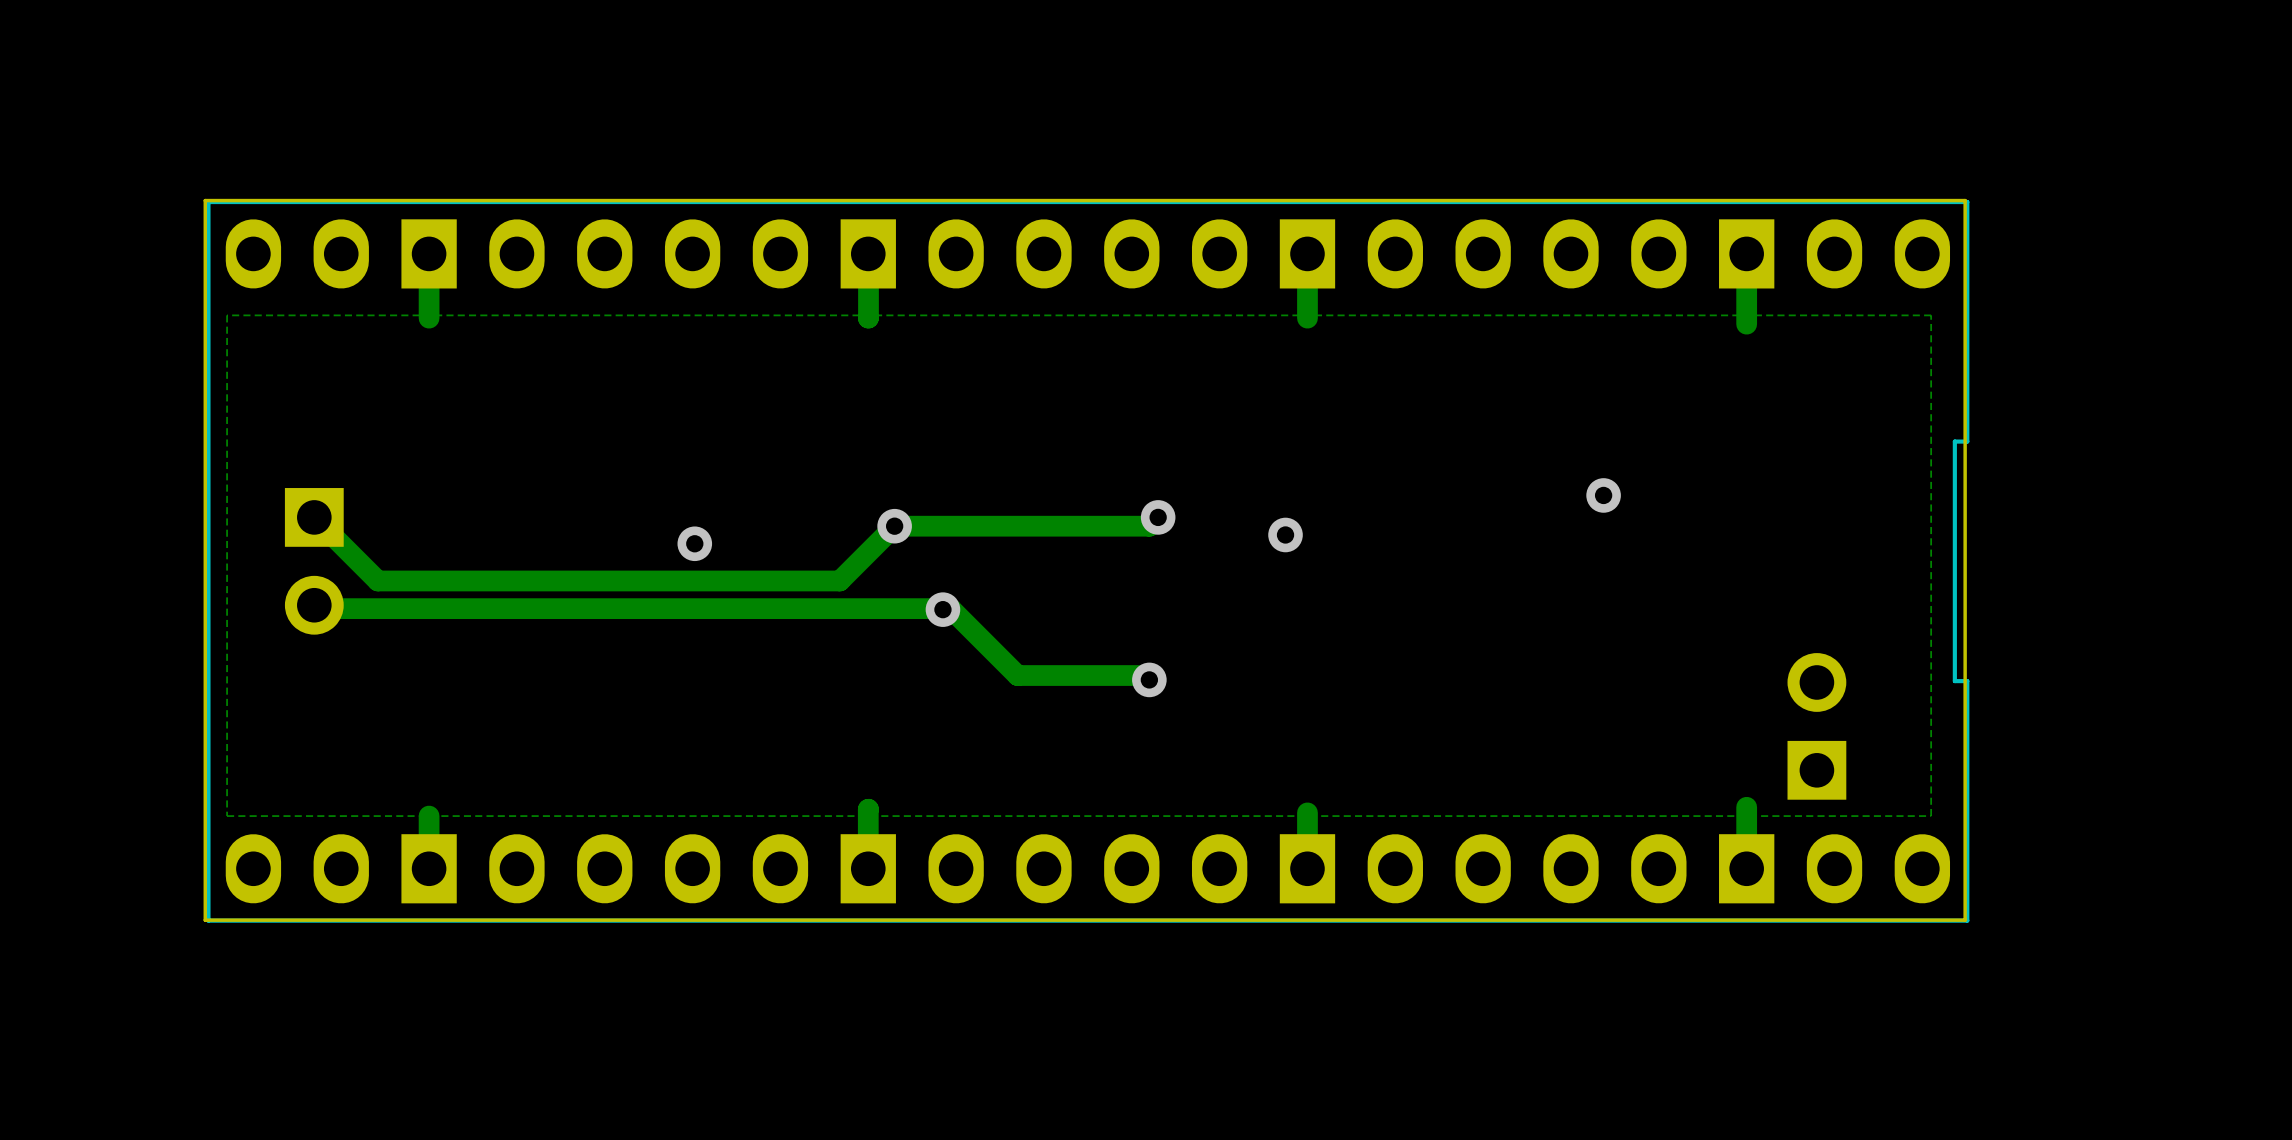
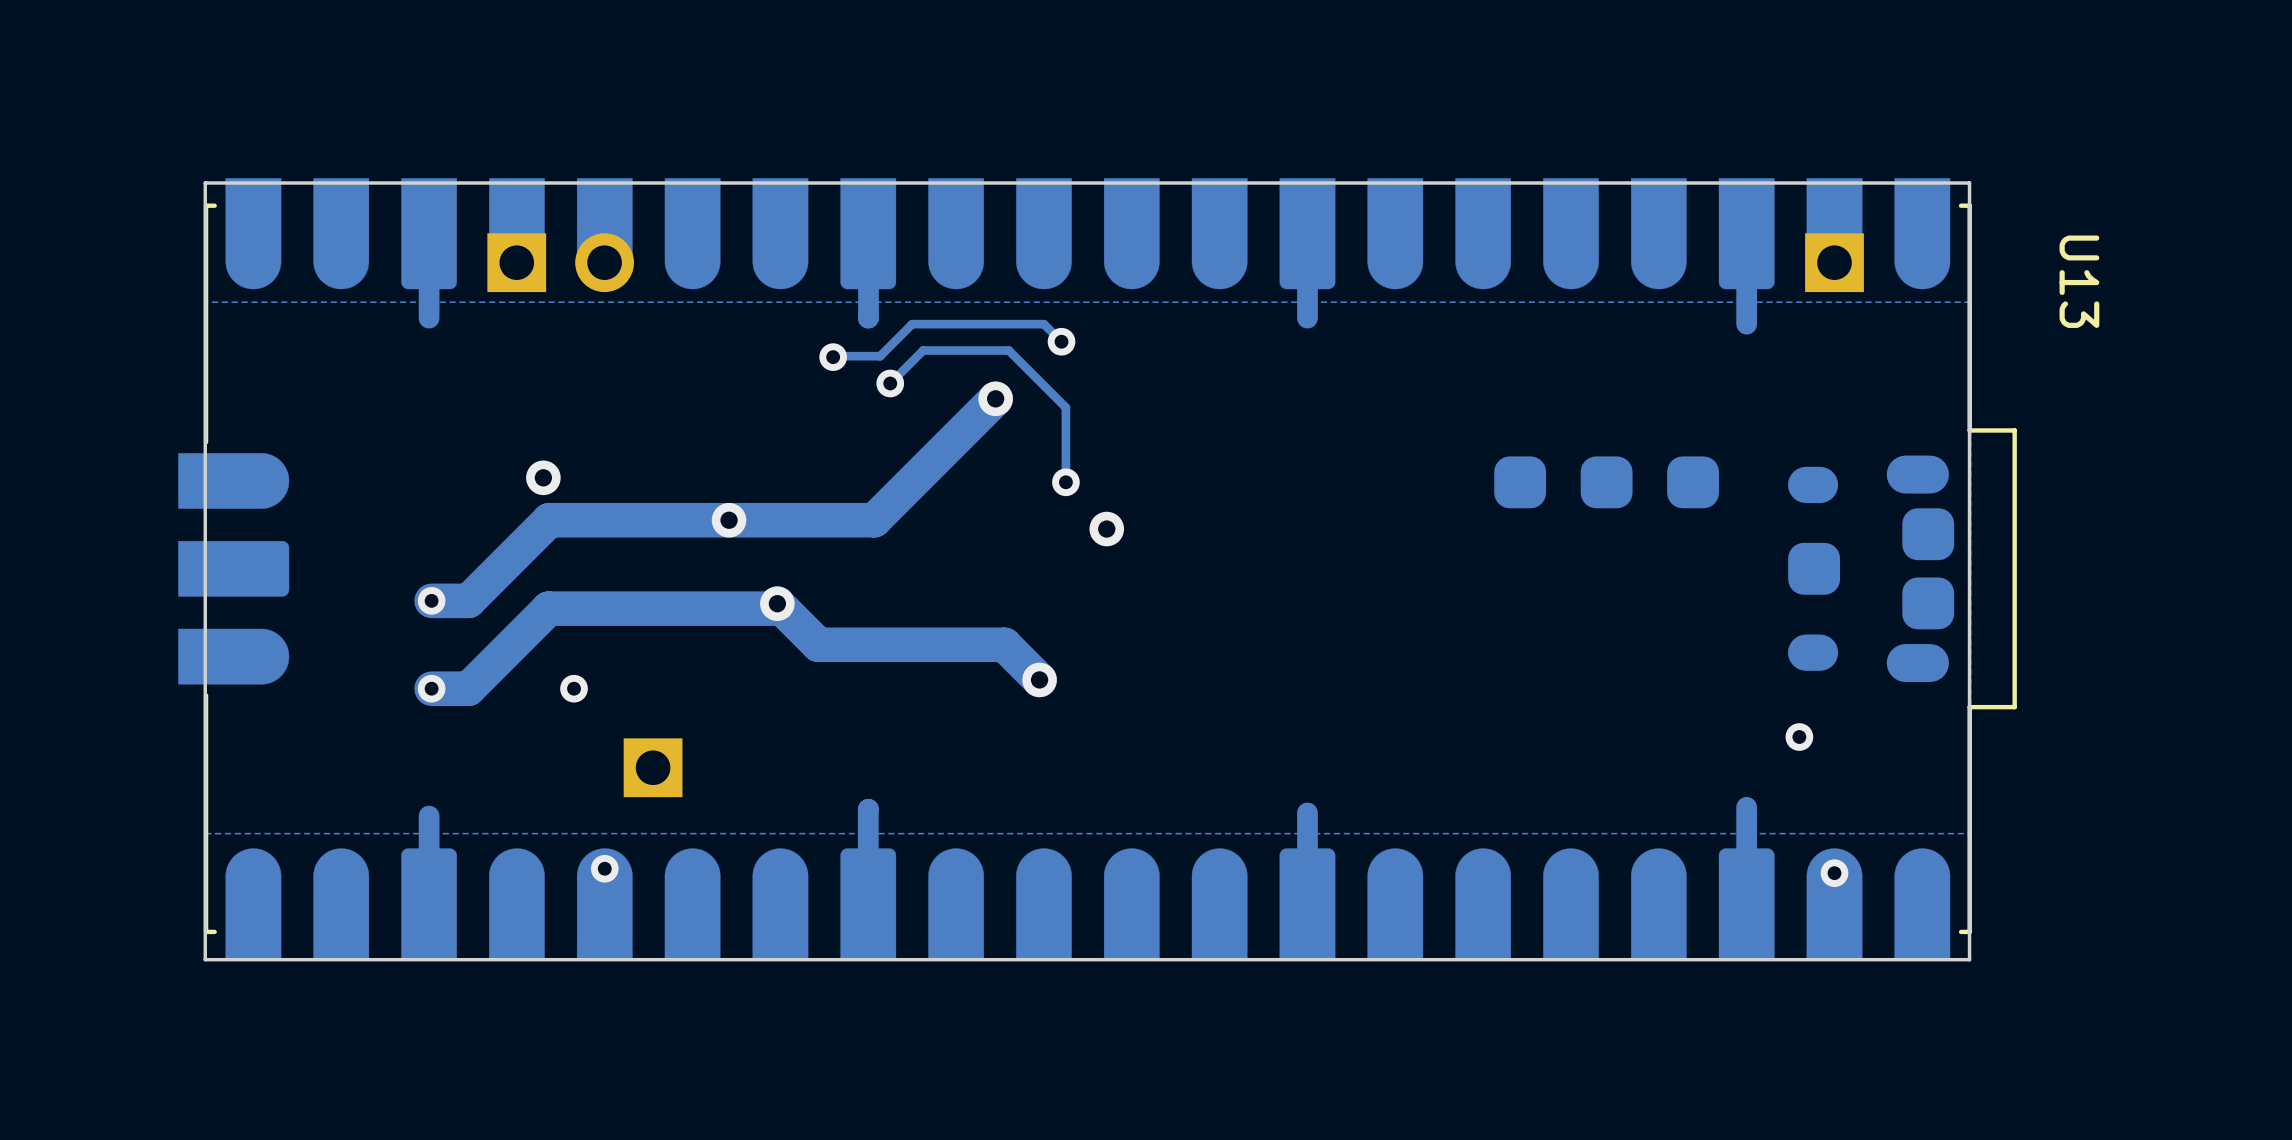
board edge: (205, 200) (1965, 200) (1965, 920) (205, 920) -> (205, 200) (205, 183) (1969, 183) (1969, 959) (205, 959) (205, 920)
part: none -> (1834, 262)
zone outline: (1931, 315) (227, 315) (227, 816) (1931, 816) (1931, 315) -> (1970, 302) (1970, 833) (205, 833) (205, 302) (1970, 302)
track: none -> (1061, 341) (1043, 324) (912, 324) (880, 356) (833, 357)
via: none -> (1061, 341)
via: none -> (833, 357)
track: none -> (890, 383) (923, 350) (1008, 350) (1065, 407) (1065, 482)
via: none -> (890, 383)
track: none -> (995, 398) (874, 520) (549, 520) (468, 600) (431, 600)
via: none -> (995, 398)
via: none -> (543, 477)
via: none -> (1065, 482)
via: (1603, 495) -> none
track: (1158, 517) (1149, 526) (894, 526) (839, 580) (377, 580) (314, 517) -> none
via position: (1158, 517) -> (1106, 529)
via: (894, 526) -> none
via: (1285, 534) -> none
via position: (694, 543) -> (729, 520)
part rotation: 0° (314, 561) -> 90° counterclockwise (560, 262)
part position: (314, 561) -> (560, 262)
part: (1087, 561) -> none
U13: none -> (1097, 568)
via: none -> (431, 600)
via: none -> (777, 603)
track: (314, 605) (317, 608) (548, 608) -> (431, 688) (468, 688) (548, 608)
track: (772, 608) (941, 608) (947, 614) (954, 614) -> (772, 608) (777, 603) (818, 644) (1004, 644) (1039, 679)
track width: thin (772, 608) (548, 608) -> thick (772, 608) (548, 608)
track: (942, 609) (951, 609) (1017, 675) (1144, 675) (1149, 679) -> none
via: (942, 609) -> none
via: none -> (1039, 679)
via: (1149, 679) -> none
via: none -> (431, 688)
via: none -> (574, 688)
part: (1816, 726) -> none
via: none -> (1799, 737)
part: none -> (653, 767)
via: none -> (604, 868)
via: none -> (1834, 873)

